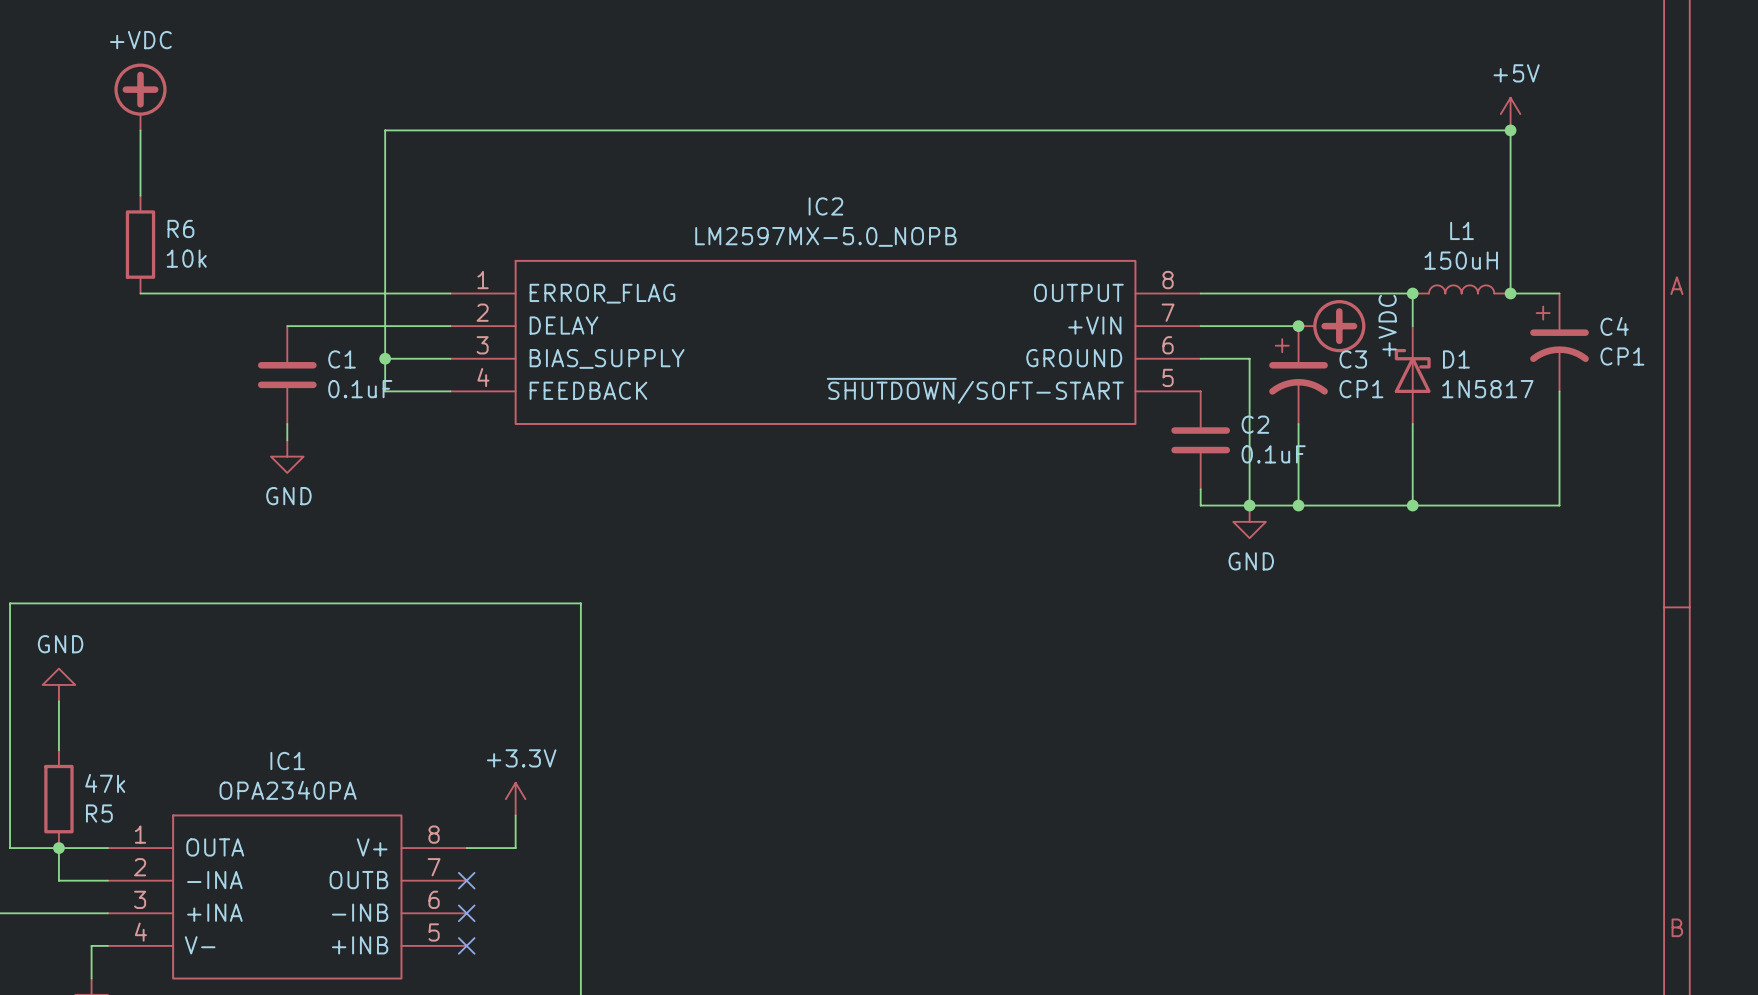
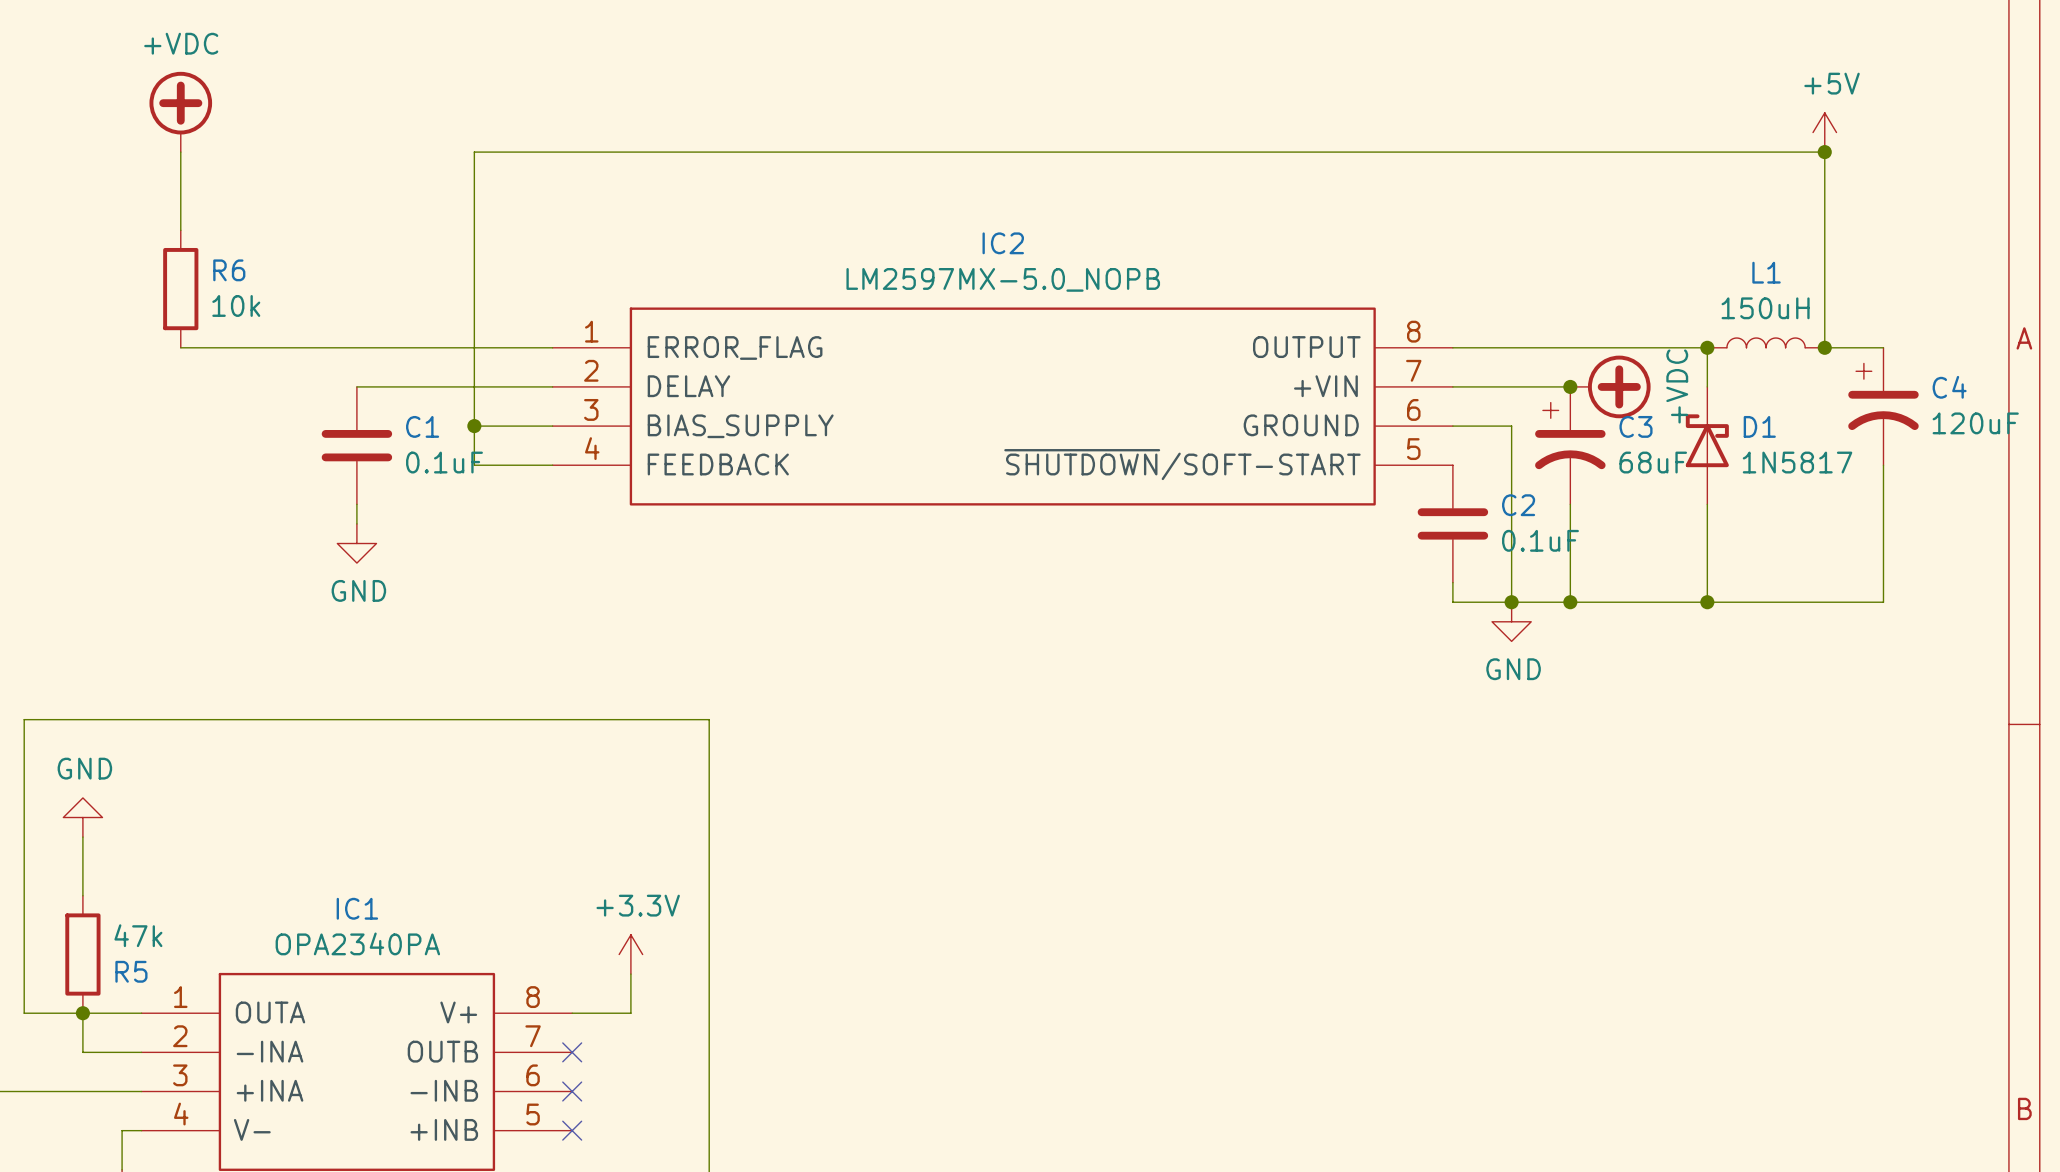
C4 value: CP1 (1622, 356) -> 120uF (1975, 423)
C3 value: CP1 (1361, 389) -> 68uF (1653, 462)

